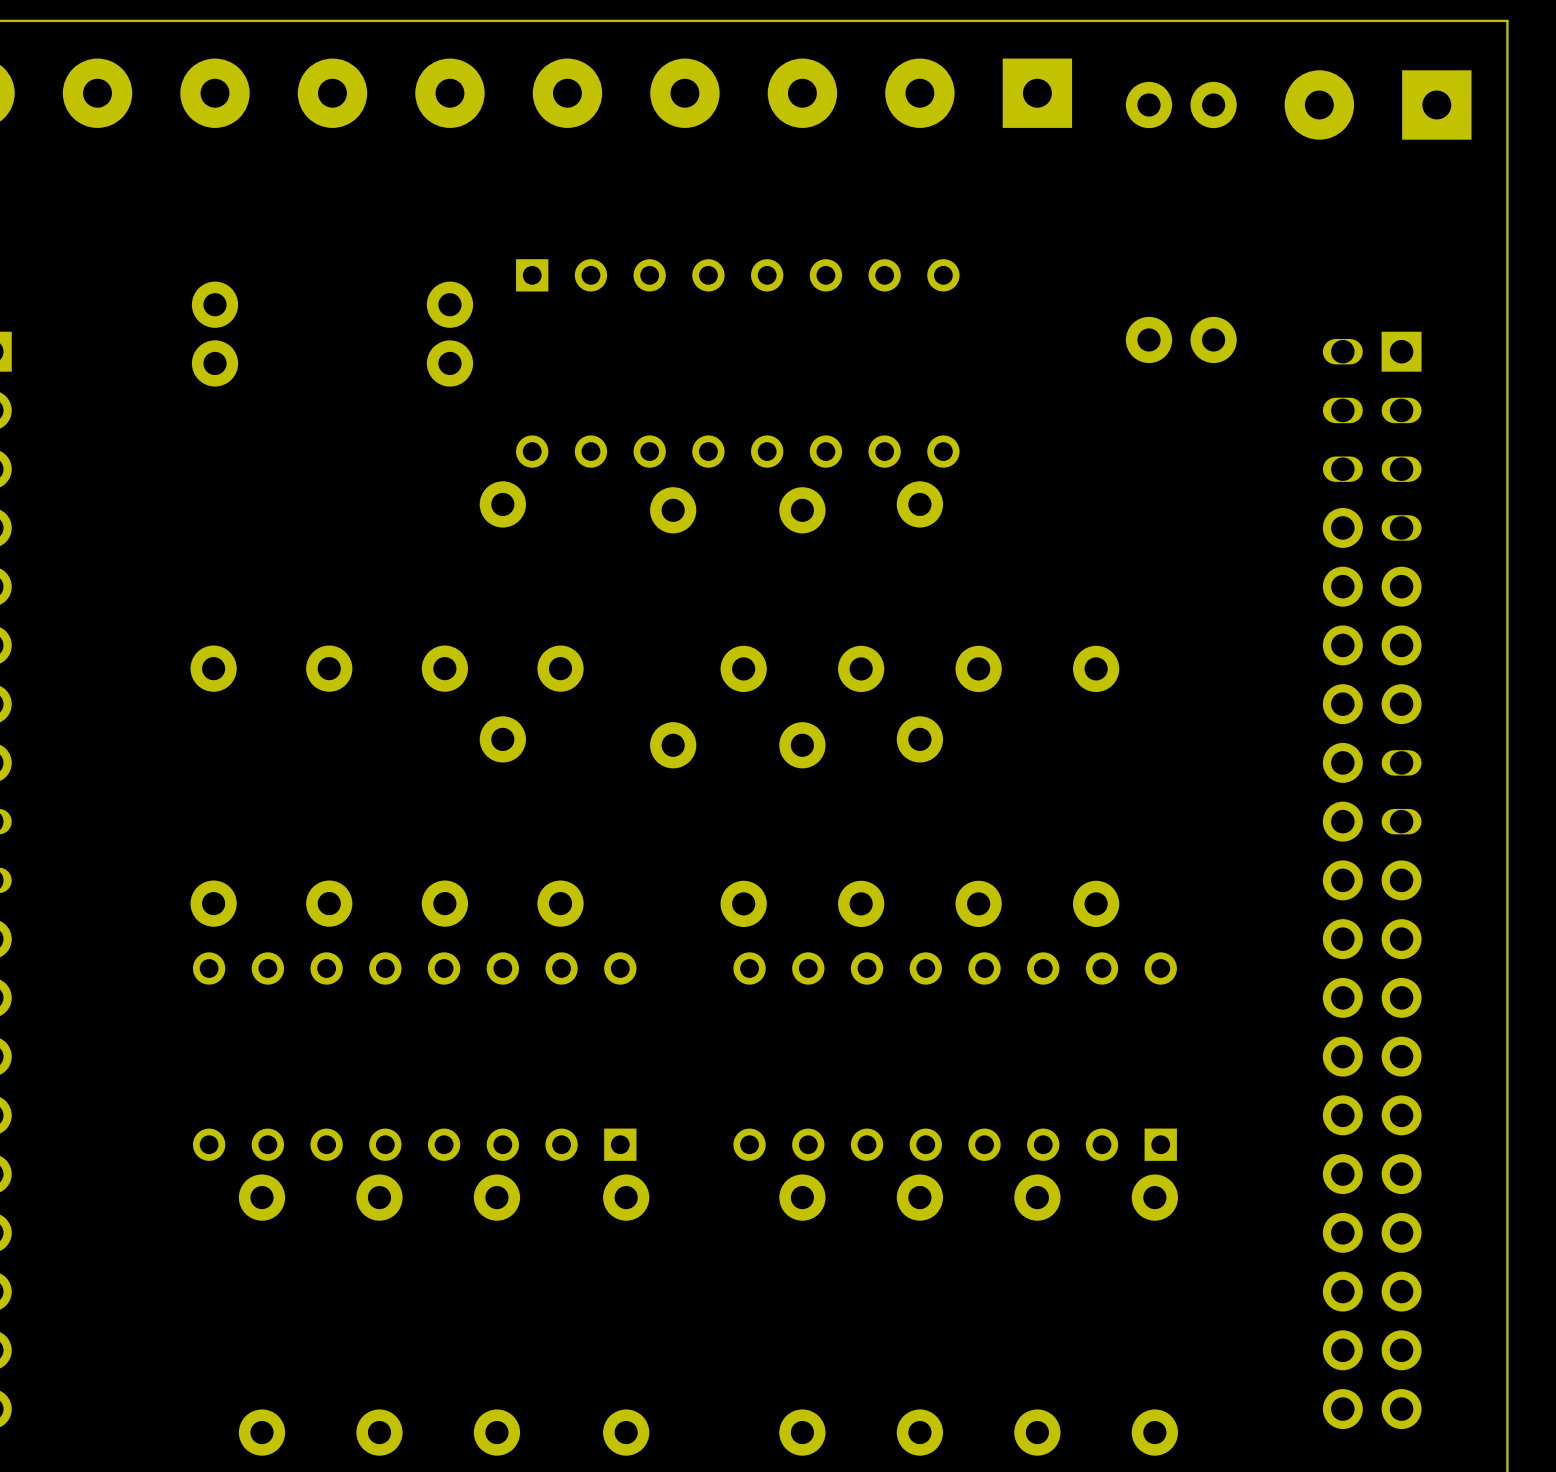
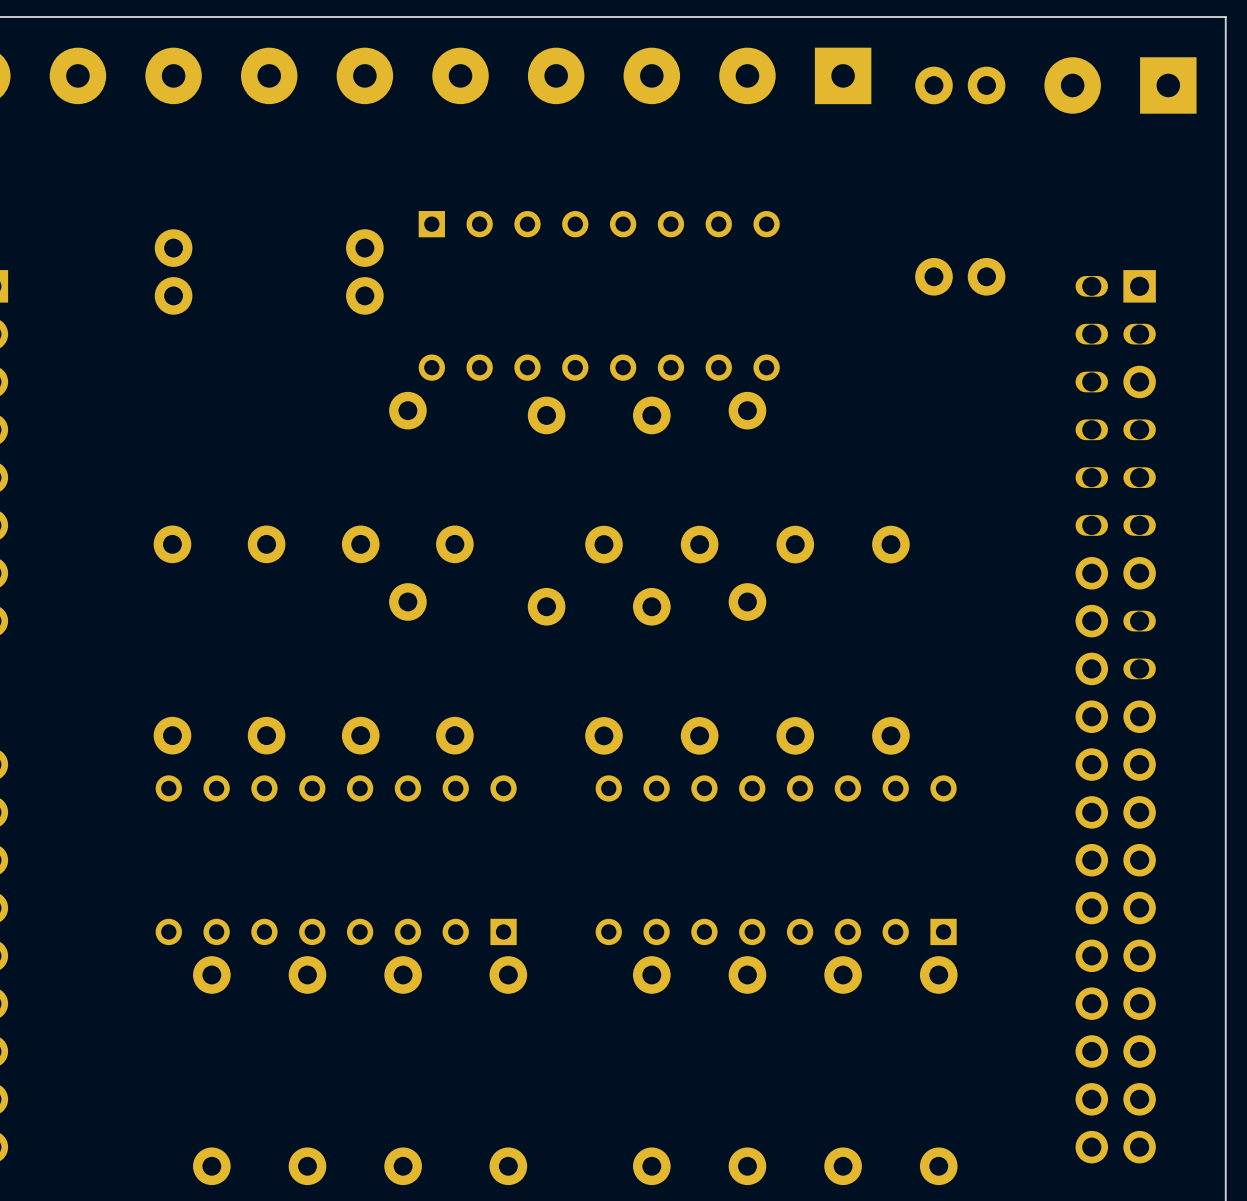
part footprint: [1322, 331, 1422, 1430] -> [1075, 270, 1156, 1164]

